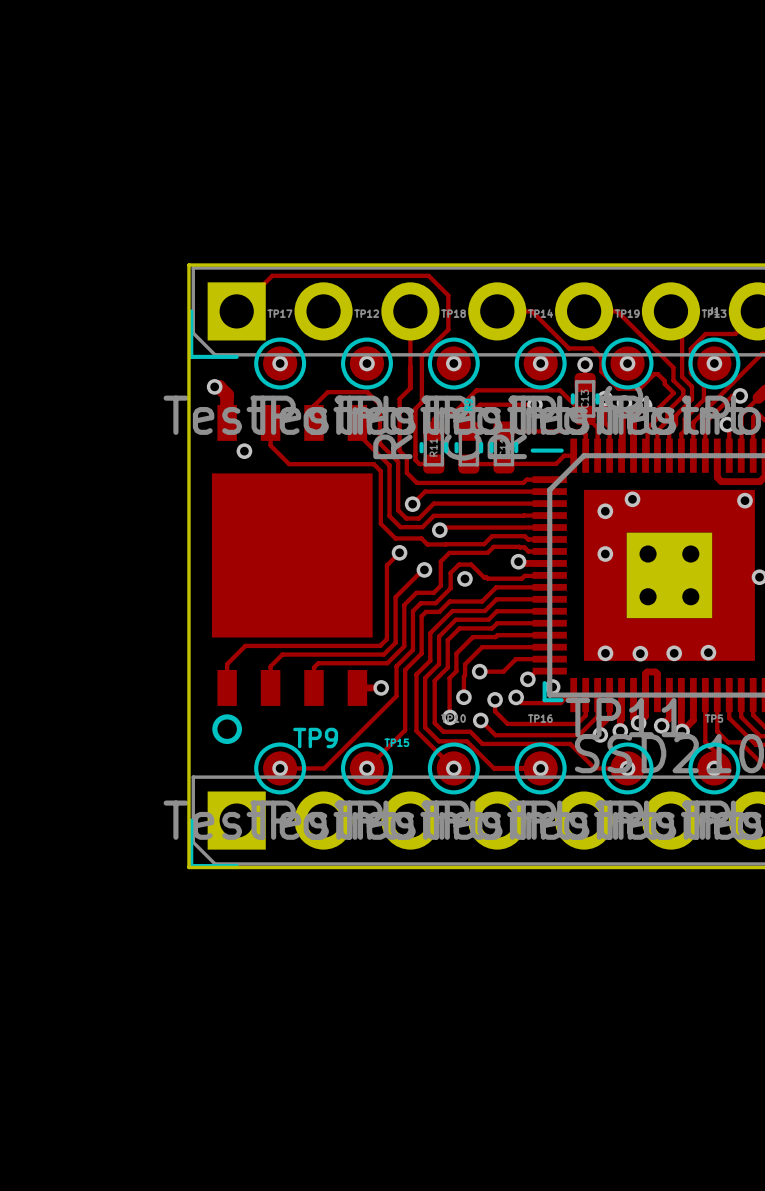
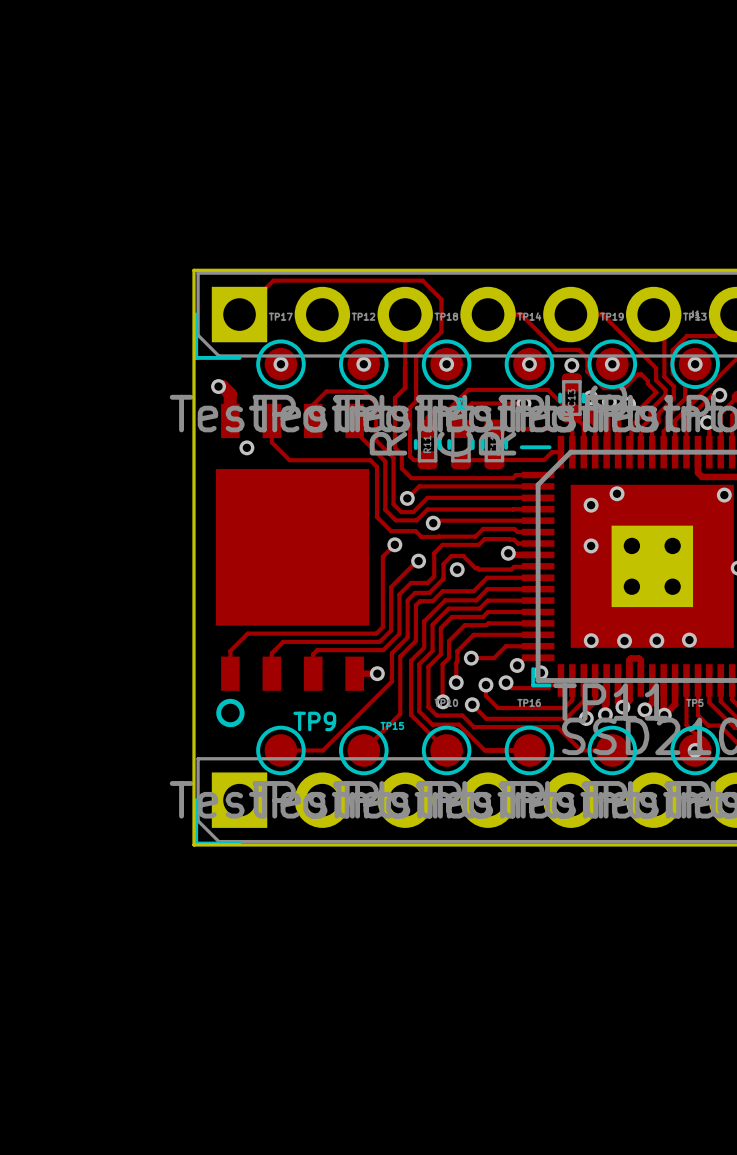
via: (280, 768) -> none
via: (366, 768) -> none
via: (453, 768) -> none
via: (540, 768) -> none
via: (627, 768) -> none

